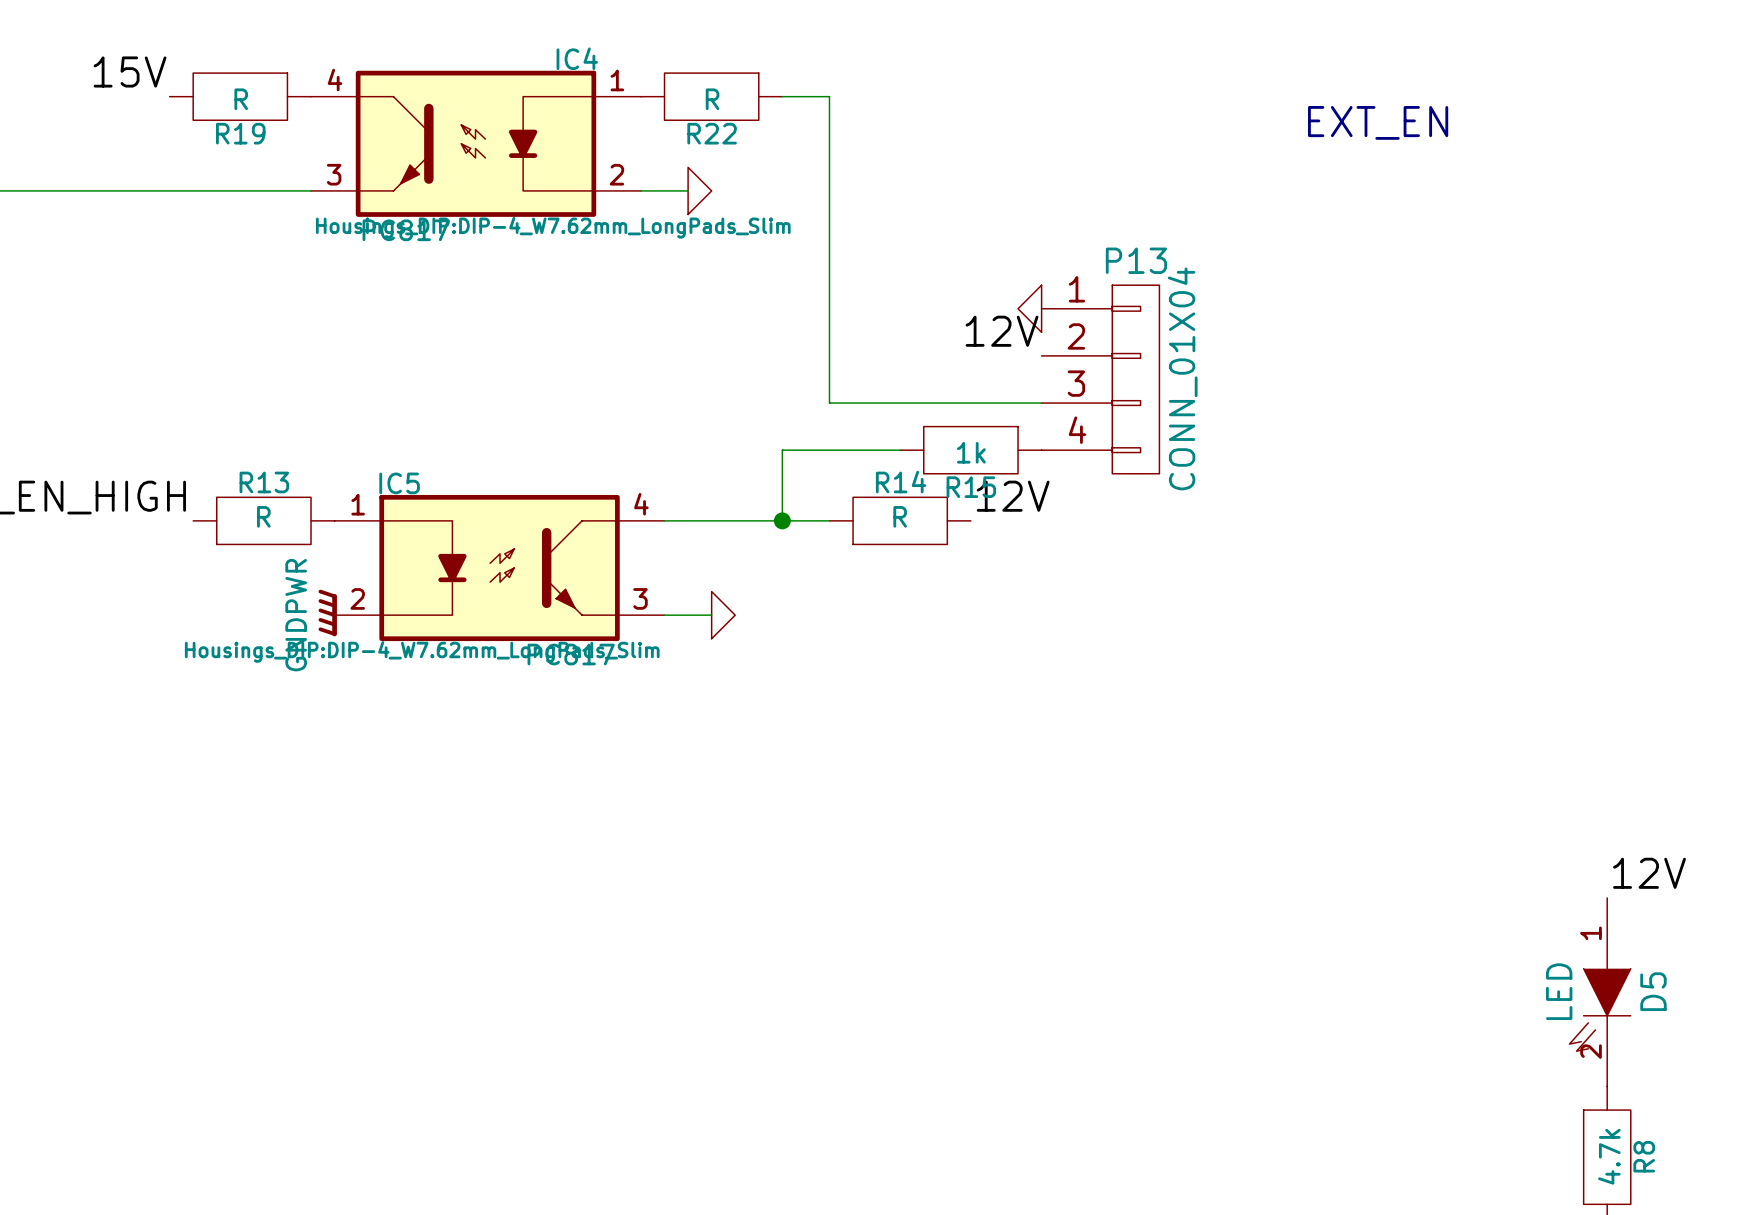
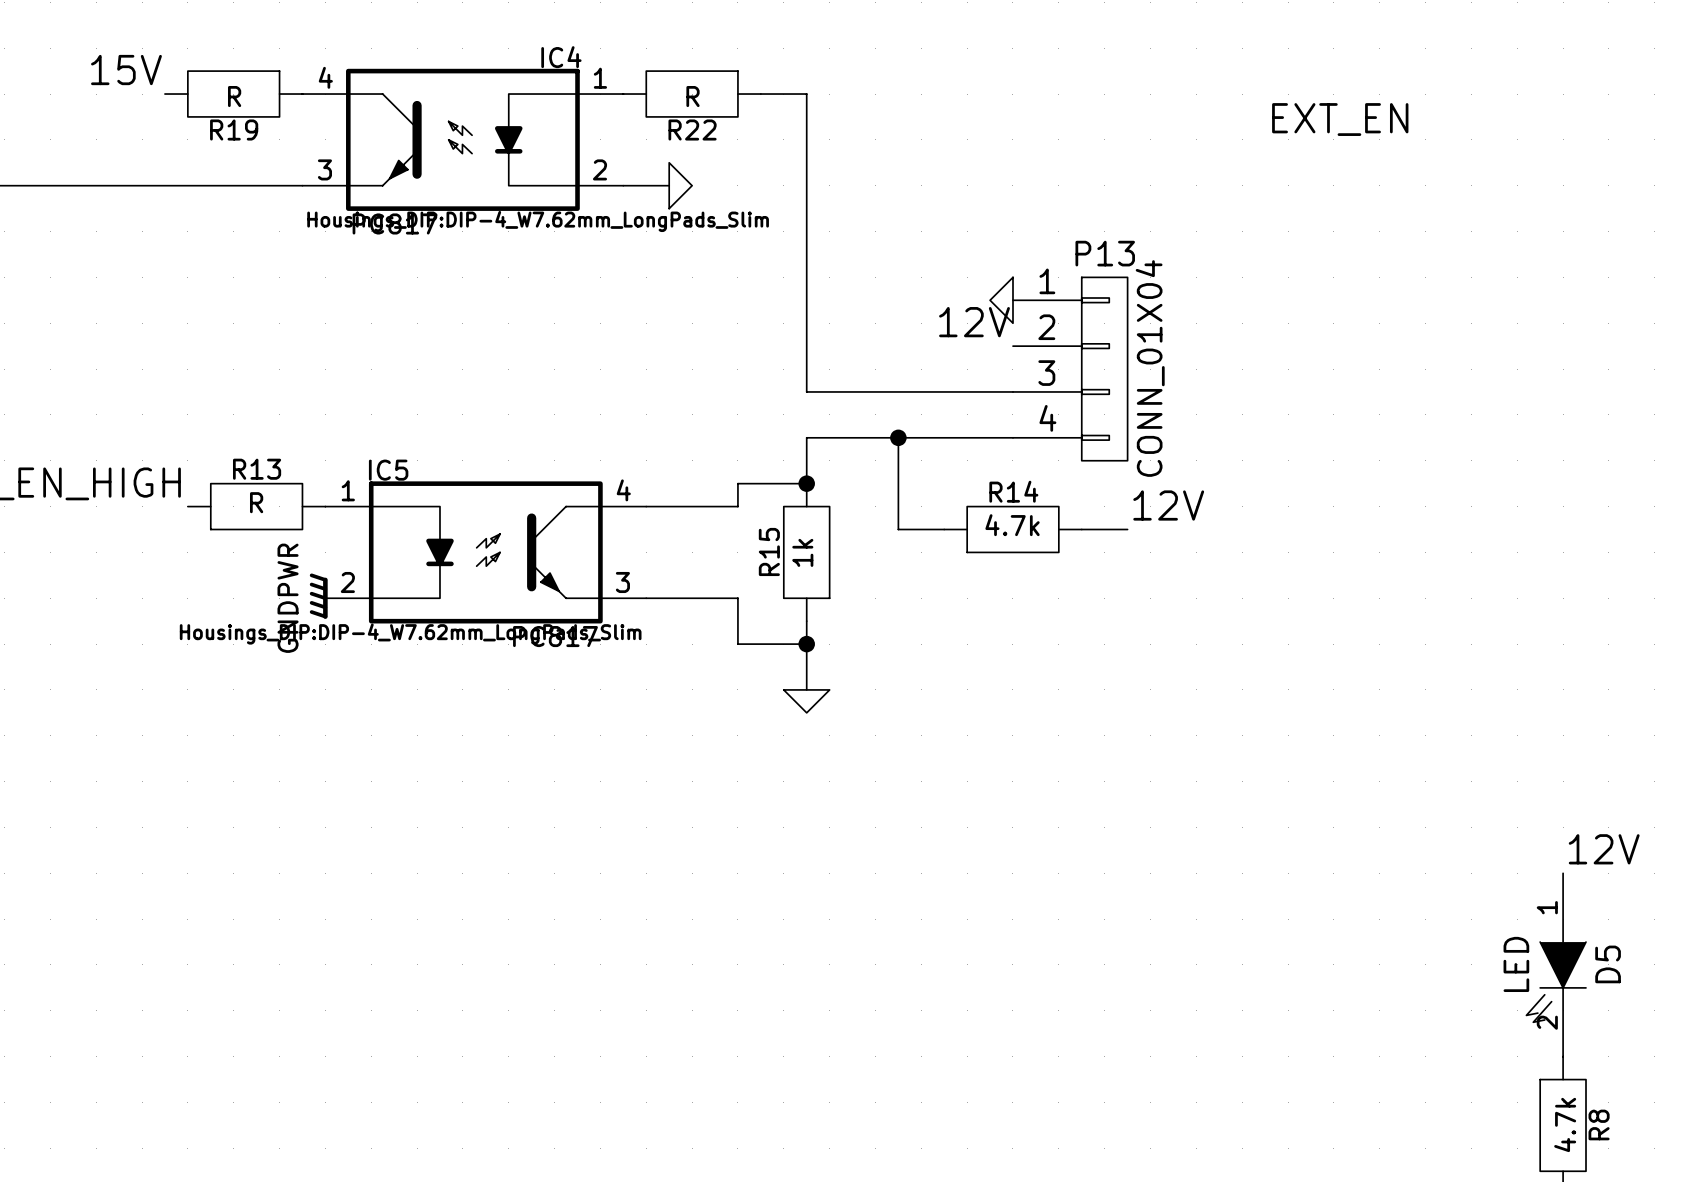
wire: (829, 450) (782, 450) (782, 520) -> (806, 437) (806, 483) (737, 483) (737, 506)
wire: none -> (875, 437) (1012, 437)
wire: none -> (898, 437) (898, 529) (944, 529)
junction: none -> (898, 437)
R15 rotation: 0° (970, 450) -> 90° clockwise (806, 552)
R15 position: (970, 450) -> (806, 552)
label position: 12V (1013, 496) -> 12V (1168, 505)
R14 value: R (900, 516) -> 4.7k (1012, 525)
wire: (758, 520) (829, 520) -> none
junction position: (782, 520) -> (806, 483)
R14 position: (900, 520) -> (1012, 529)
wire: none -> (1081, 529) (1127, 529)
wire: none -> (692, 598) (737, 598) (737, 644) (806, 644)
power symbol rotation: 0° (723, 615) -> 90° clockwise (806, 701)
power symbol position: (723, 615) -> (806, 701)
wire: none -> (806, 621) (806, 689)
junction: none -> (806, 644)

